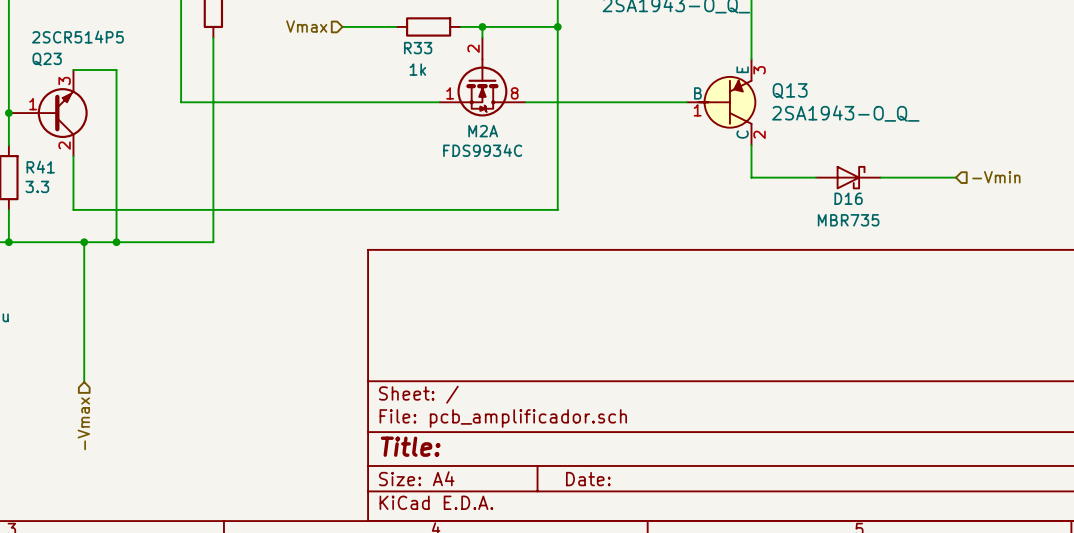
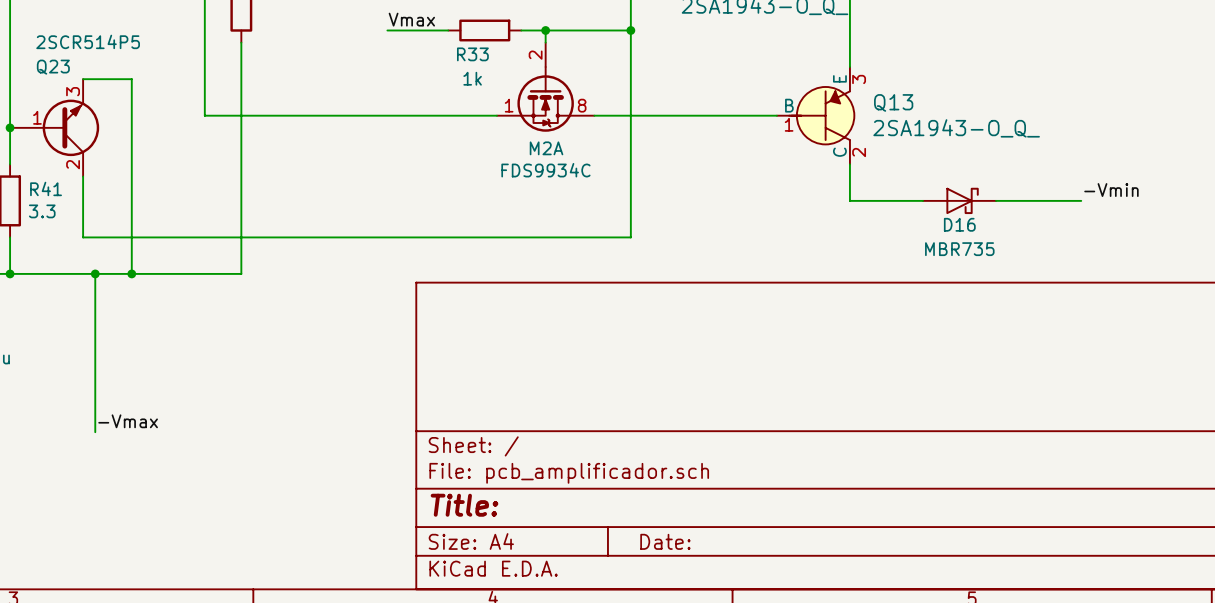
label: none -> Vmax (411, 19)
hierarchical label: Vmax (306, 26) -> none
label: none -> -Vmin (1111, 190)
hierarchical label: -Vmin (996, 177) -> none
label: none -> -Vmax (128, 421)
hierarchical label: -Vmax (83, 423) -> none

